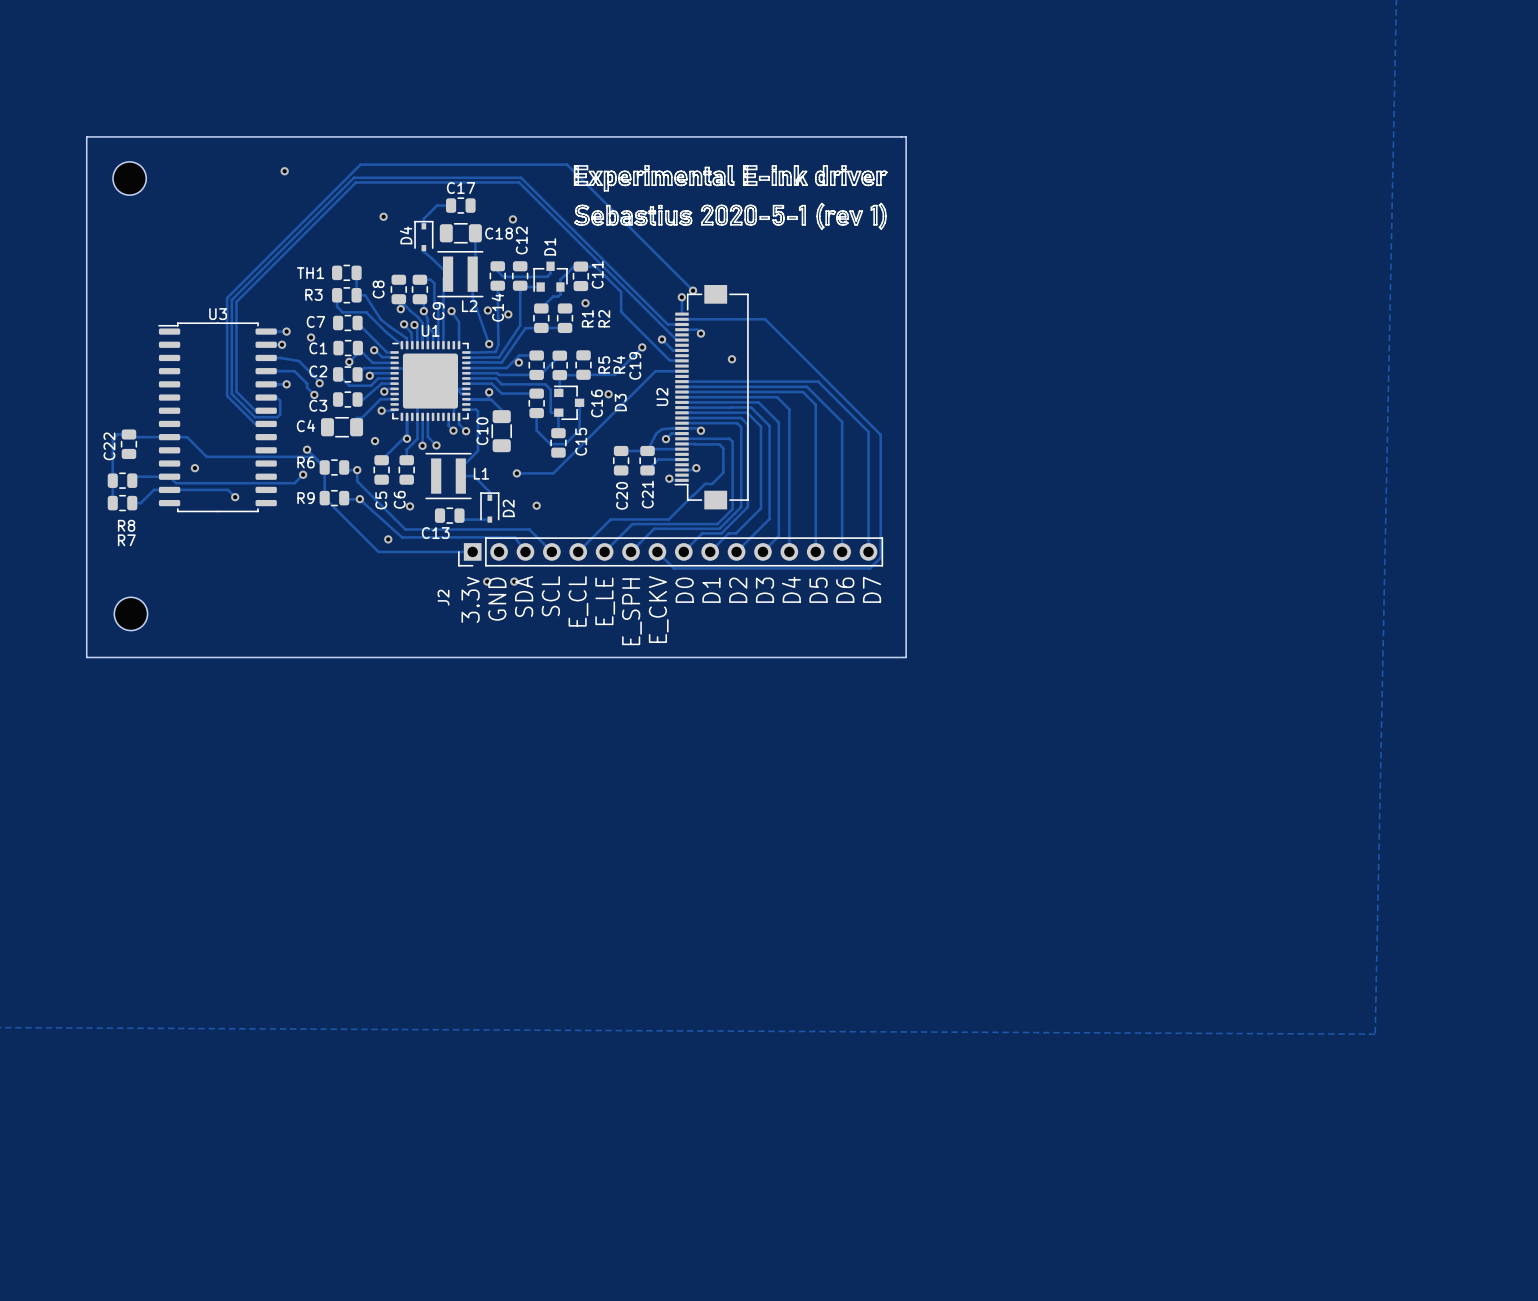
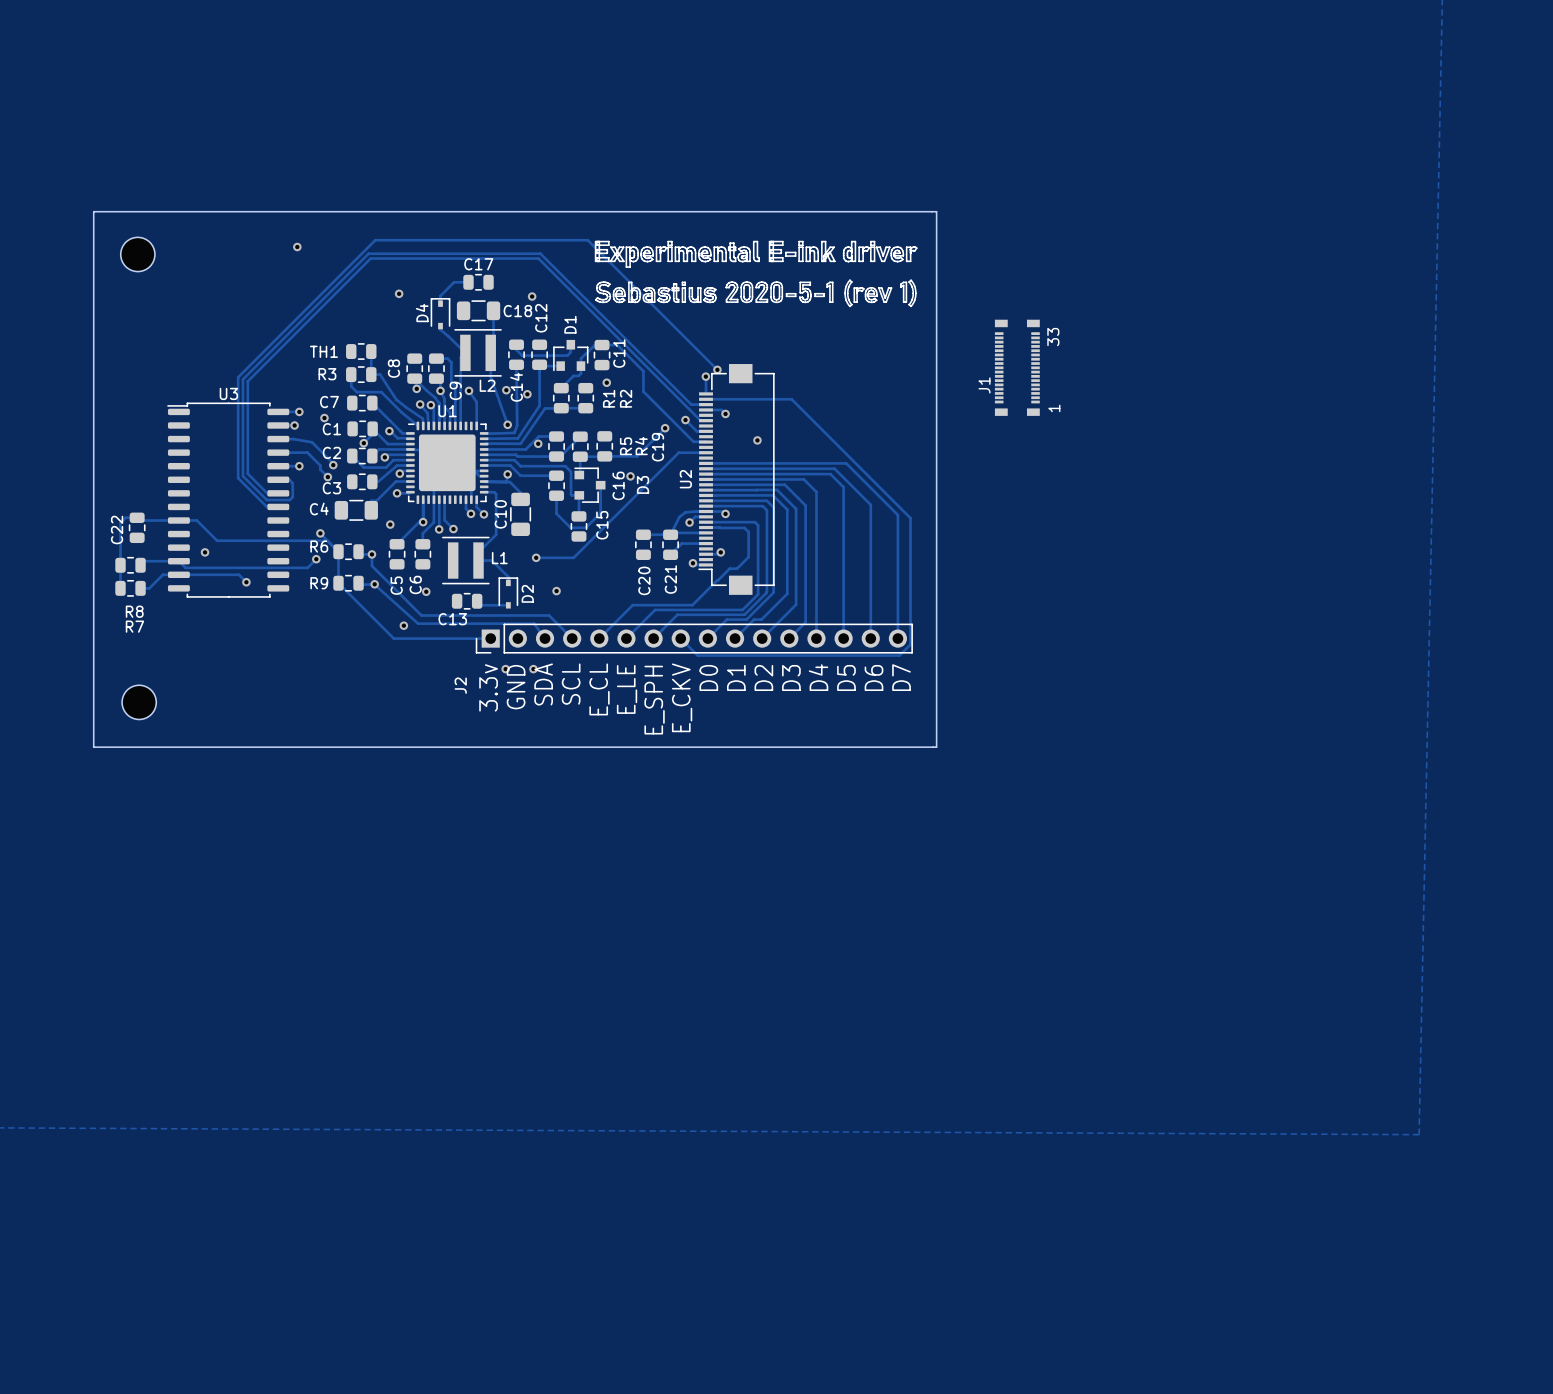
J1: none -> (1017, 367)

